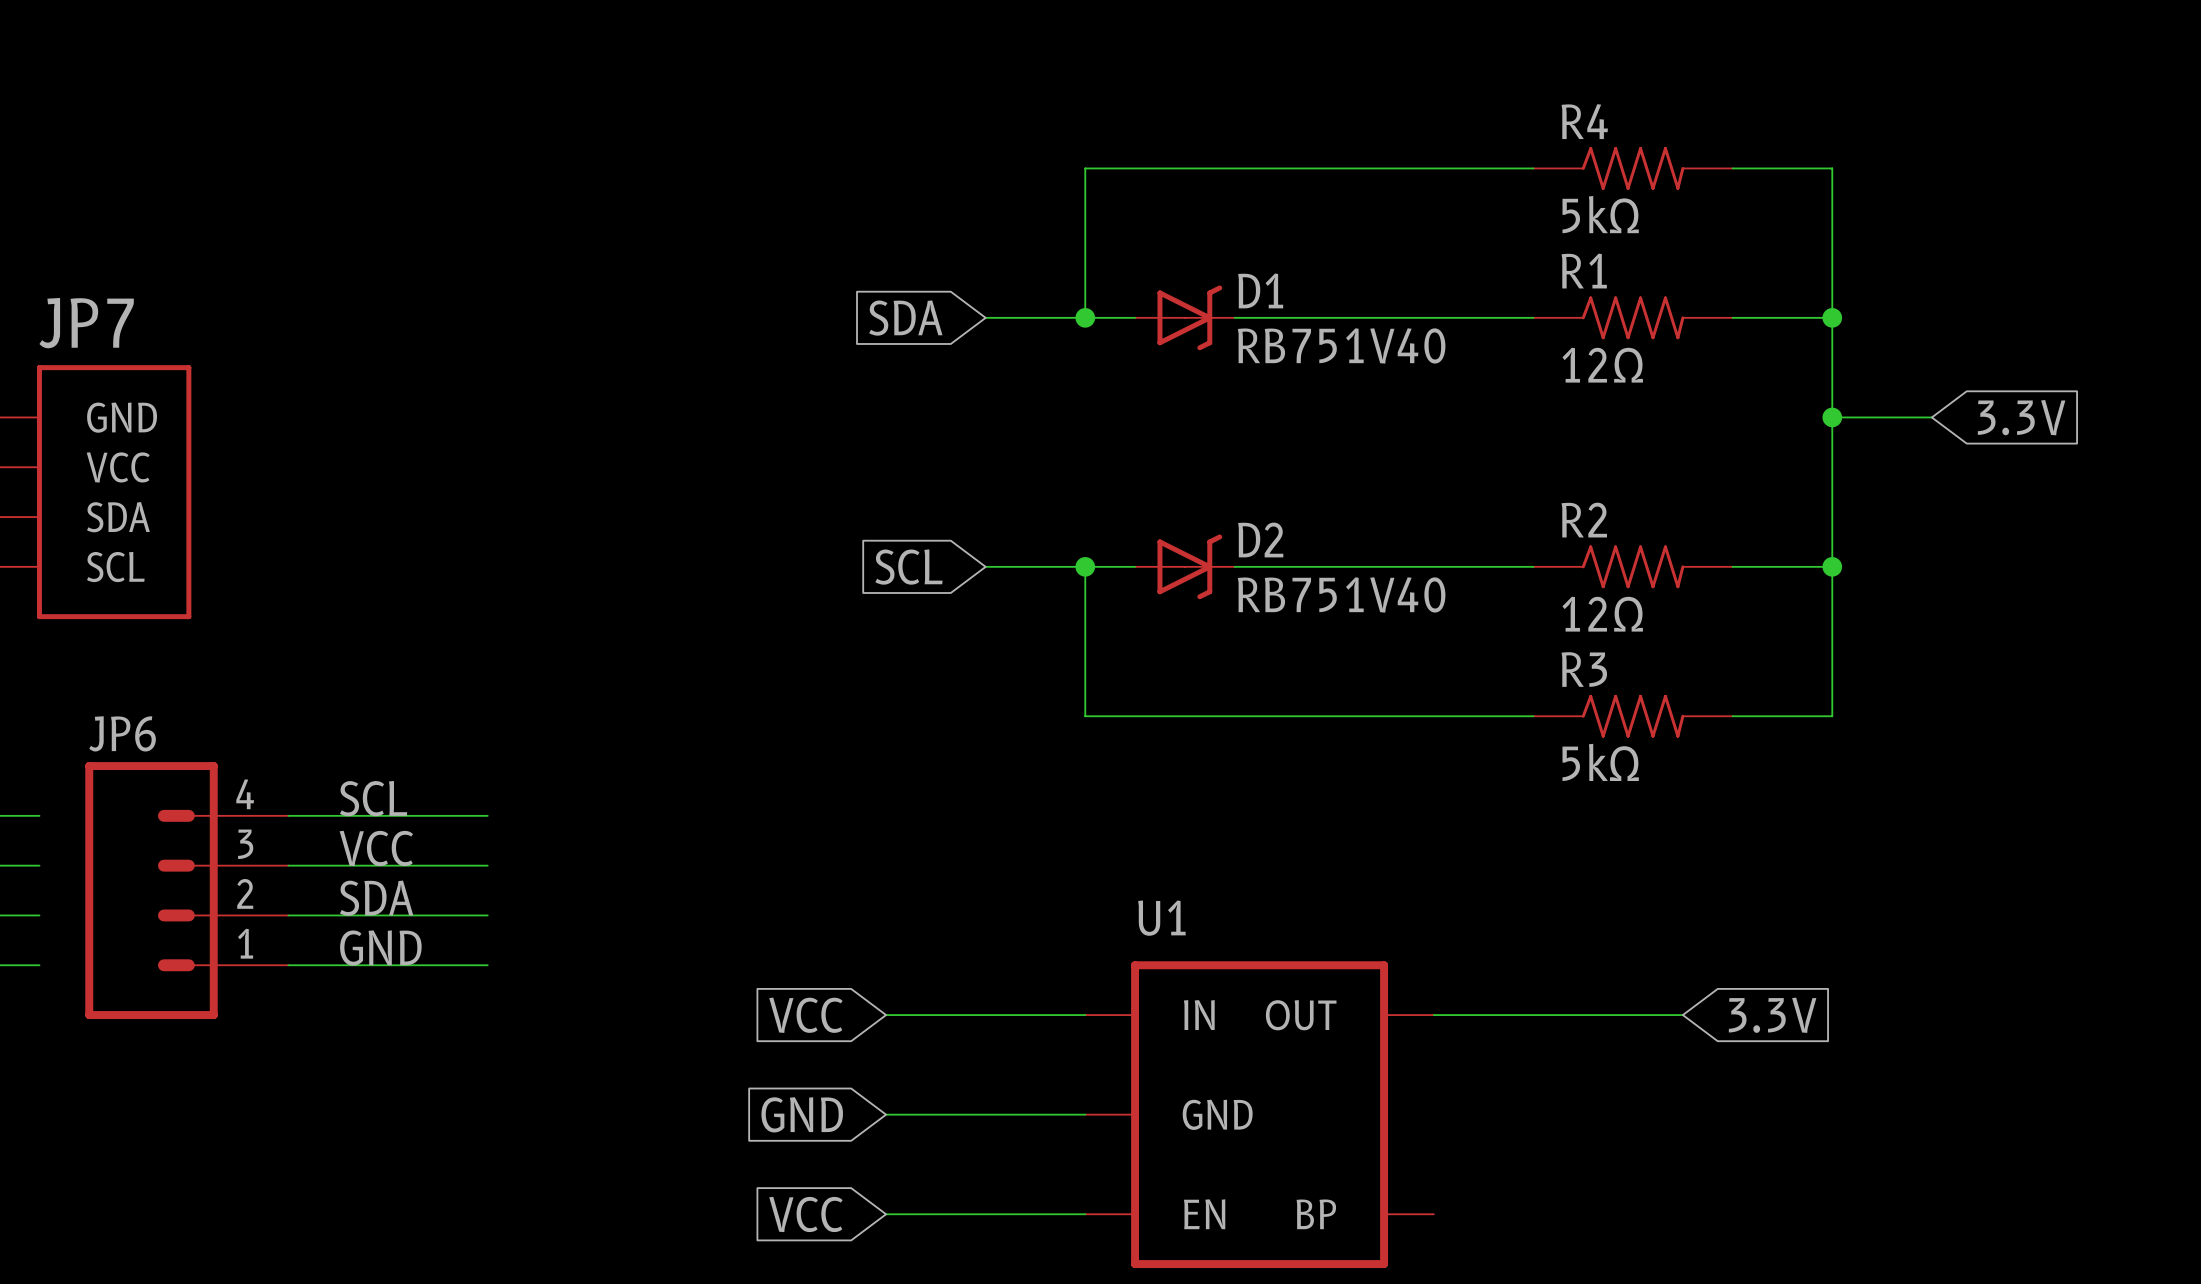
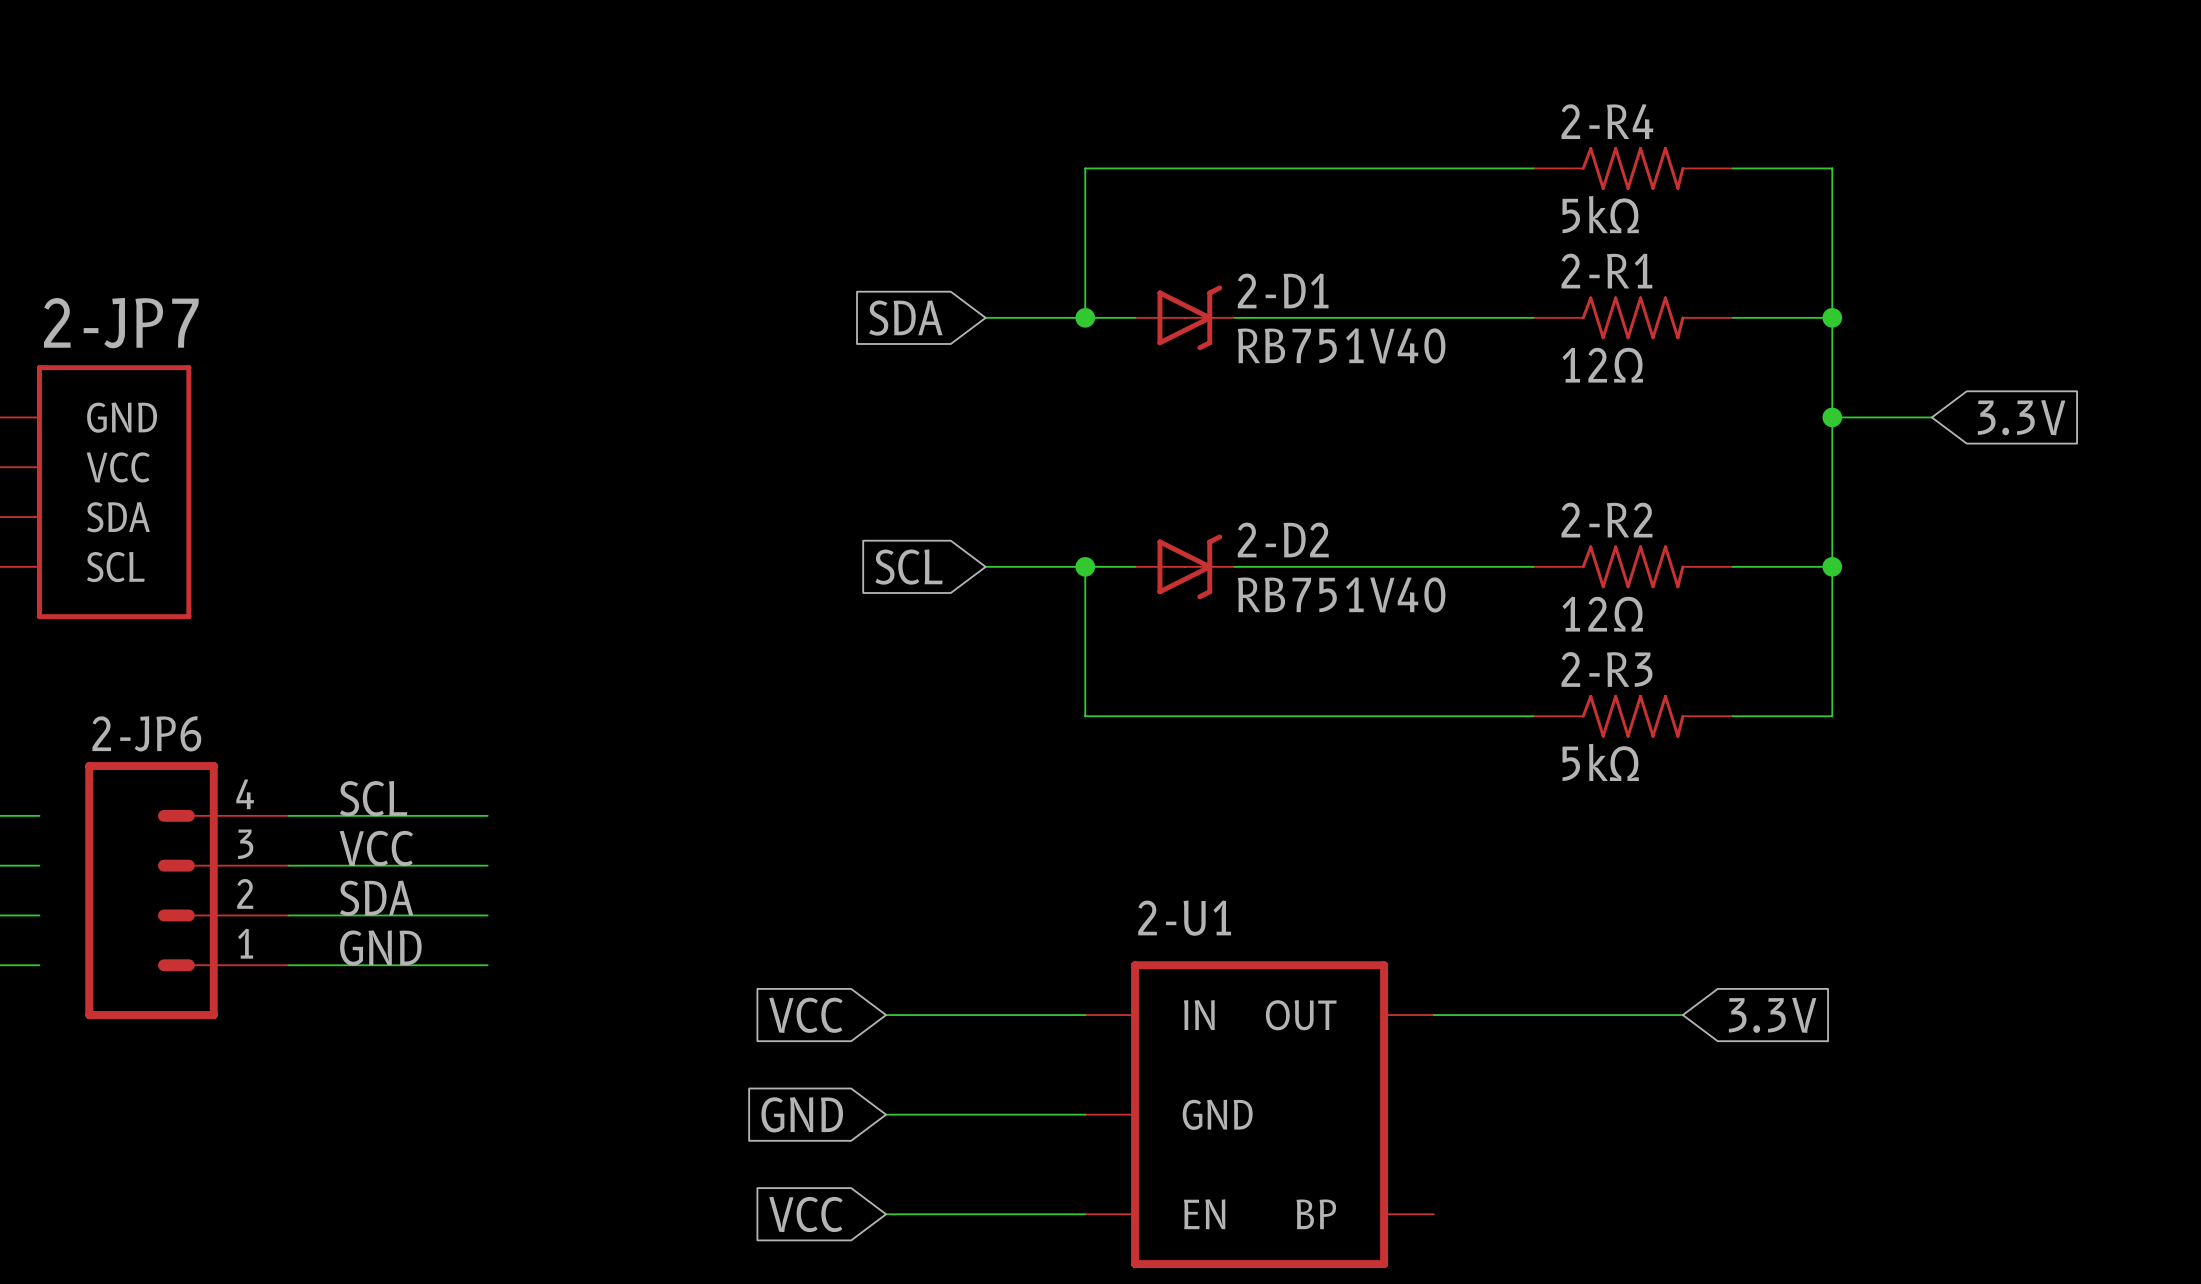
R4 name: R4 (1584, 121) -> 2-R4 (1607, 121)
R1 name: R1 (1584, 271) -> 2-R1 (1606, 271)
D1 name: D1 (1260, 290) -> 2-D1 (1283, 290)
JP7 name: JP7 (86, 323) -> 2-JP7 (121, 323)
R2 name: R2 (1584, 520) -> 2-R2 (1606, 520)
D2 name: D2 (1260, 539) -> 2-D2 (1283, 539)
R3 name: R3 (1584, 669) -> 2-R3 (1606, 669)
JP6 name: JP6 (122, 733) -> 2-JP6 (146, 733)
U1 name: U1 (1161, 918) -> 2-U1 (1184, 918)

